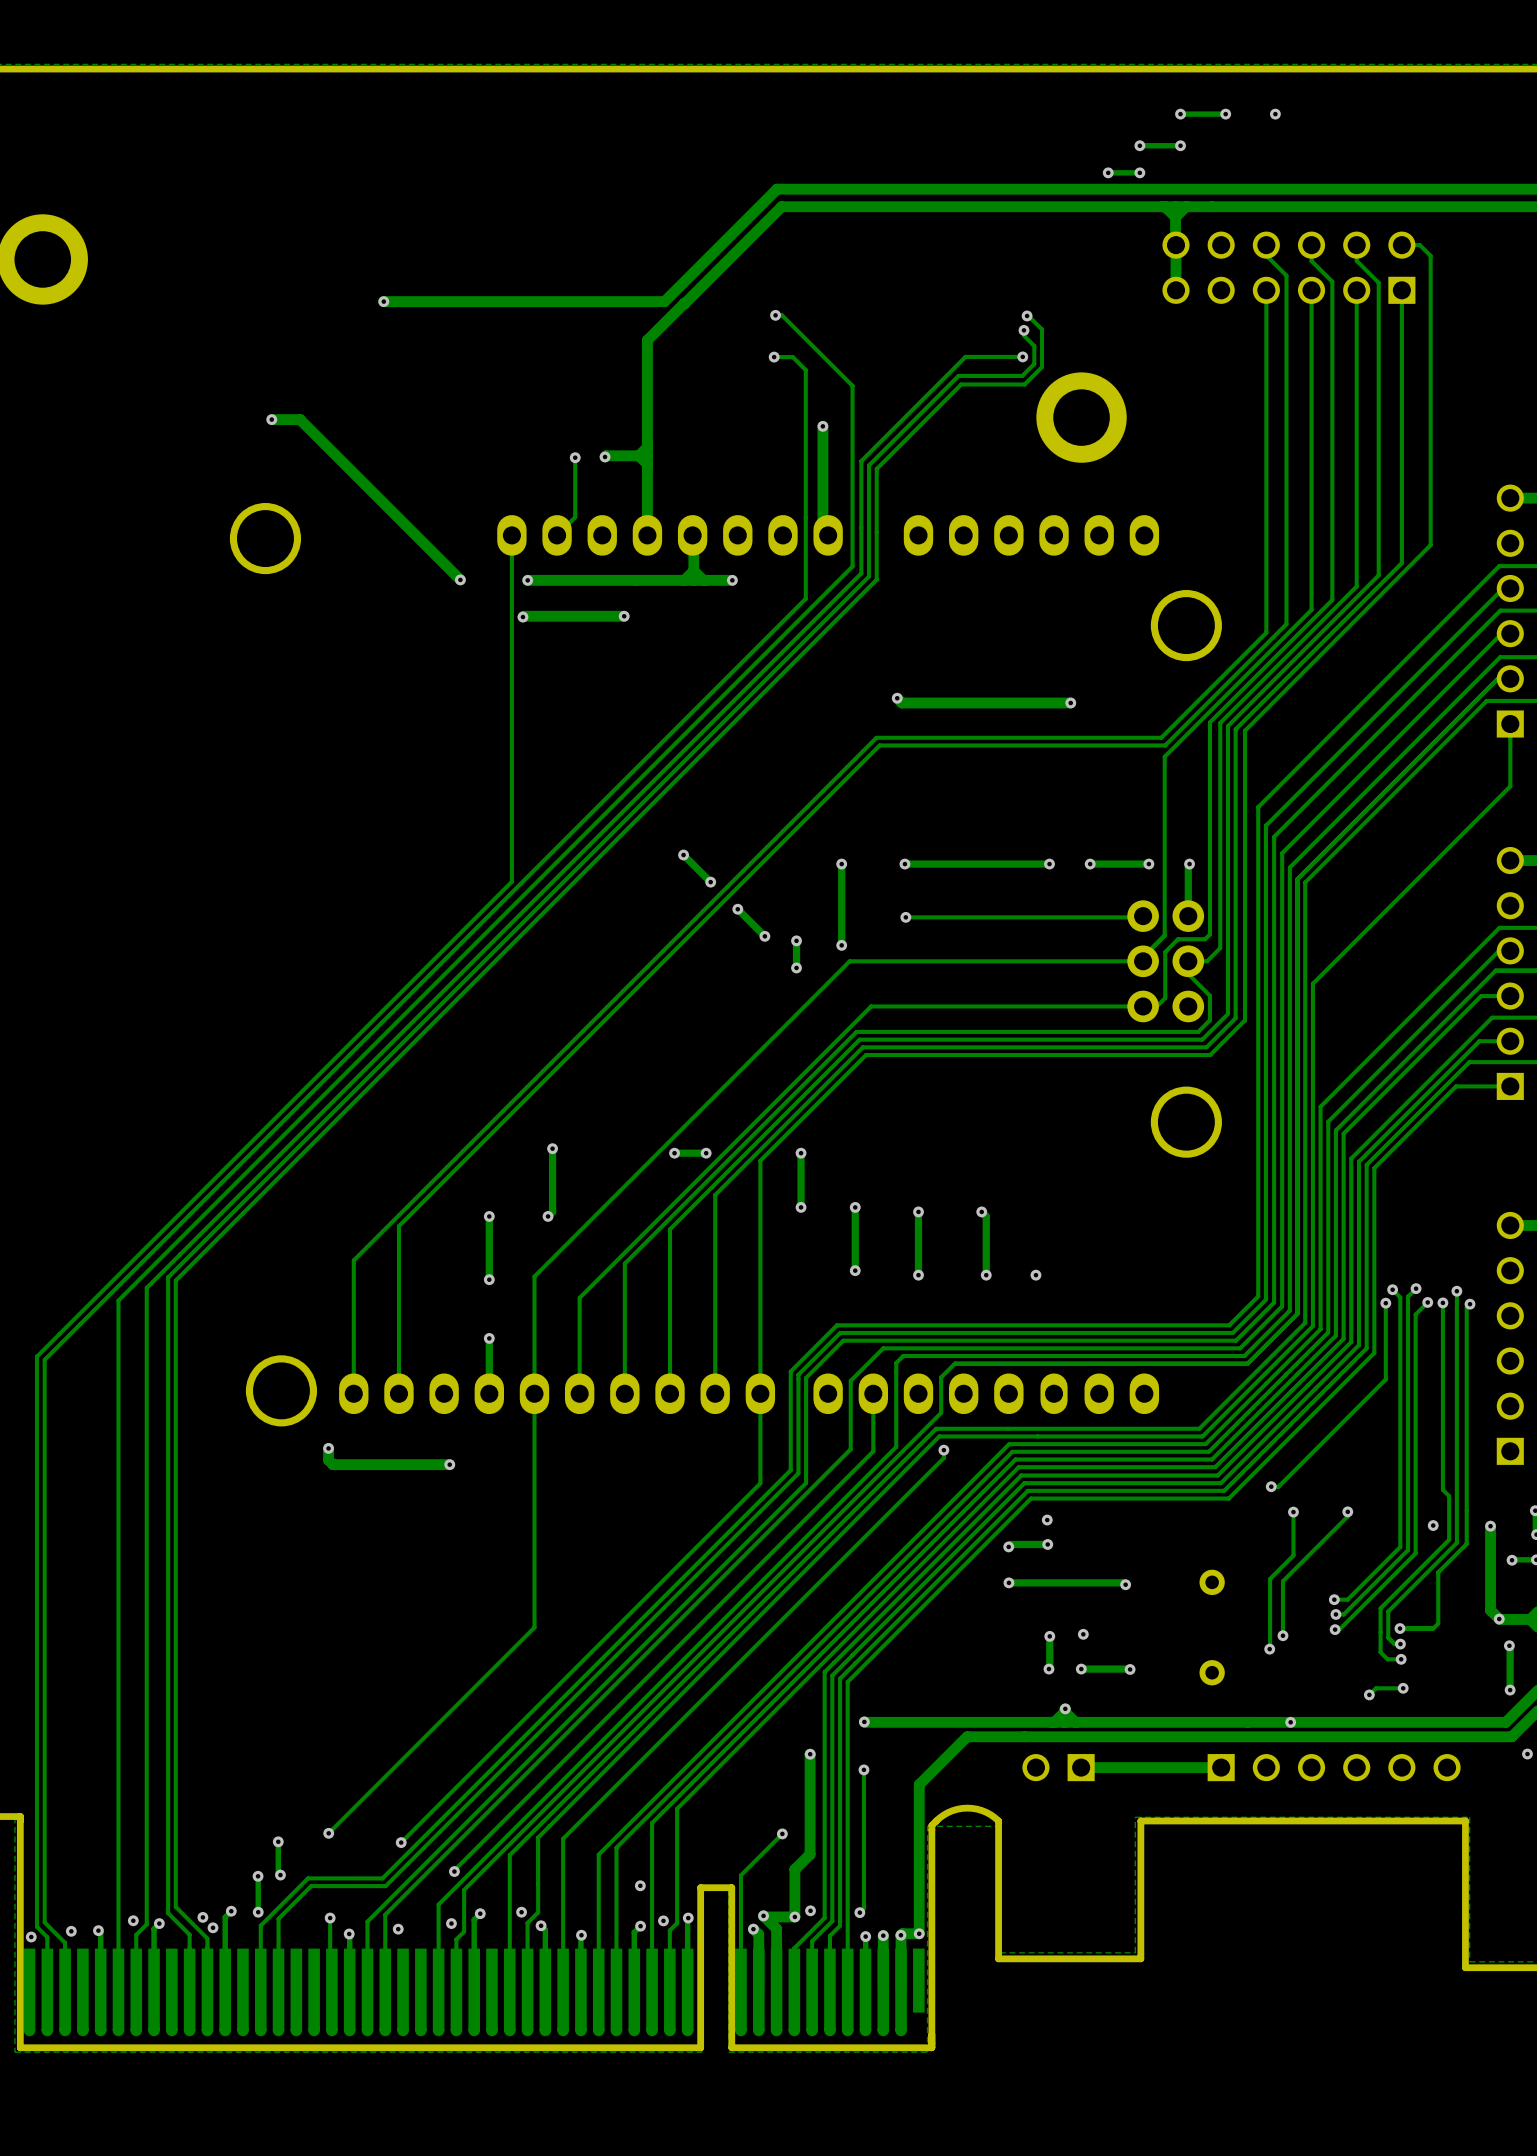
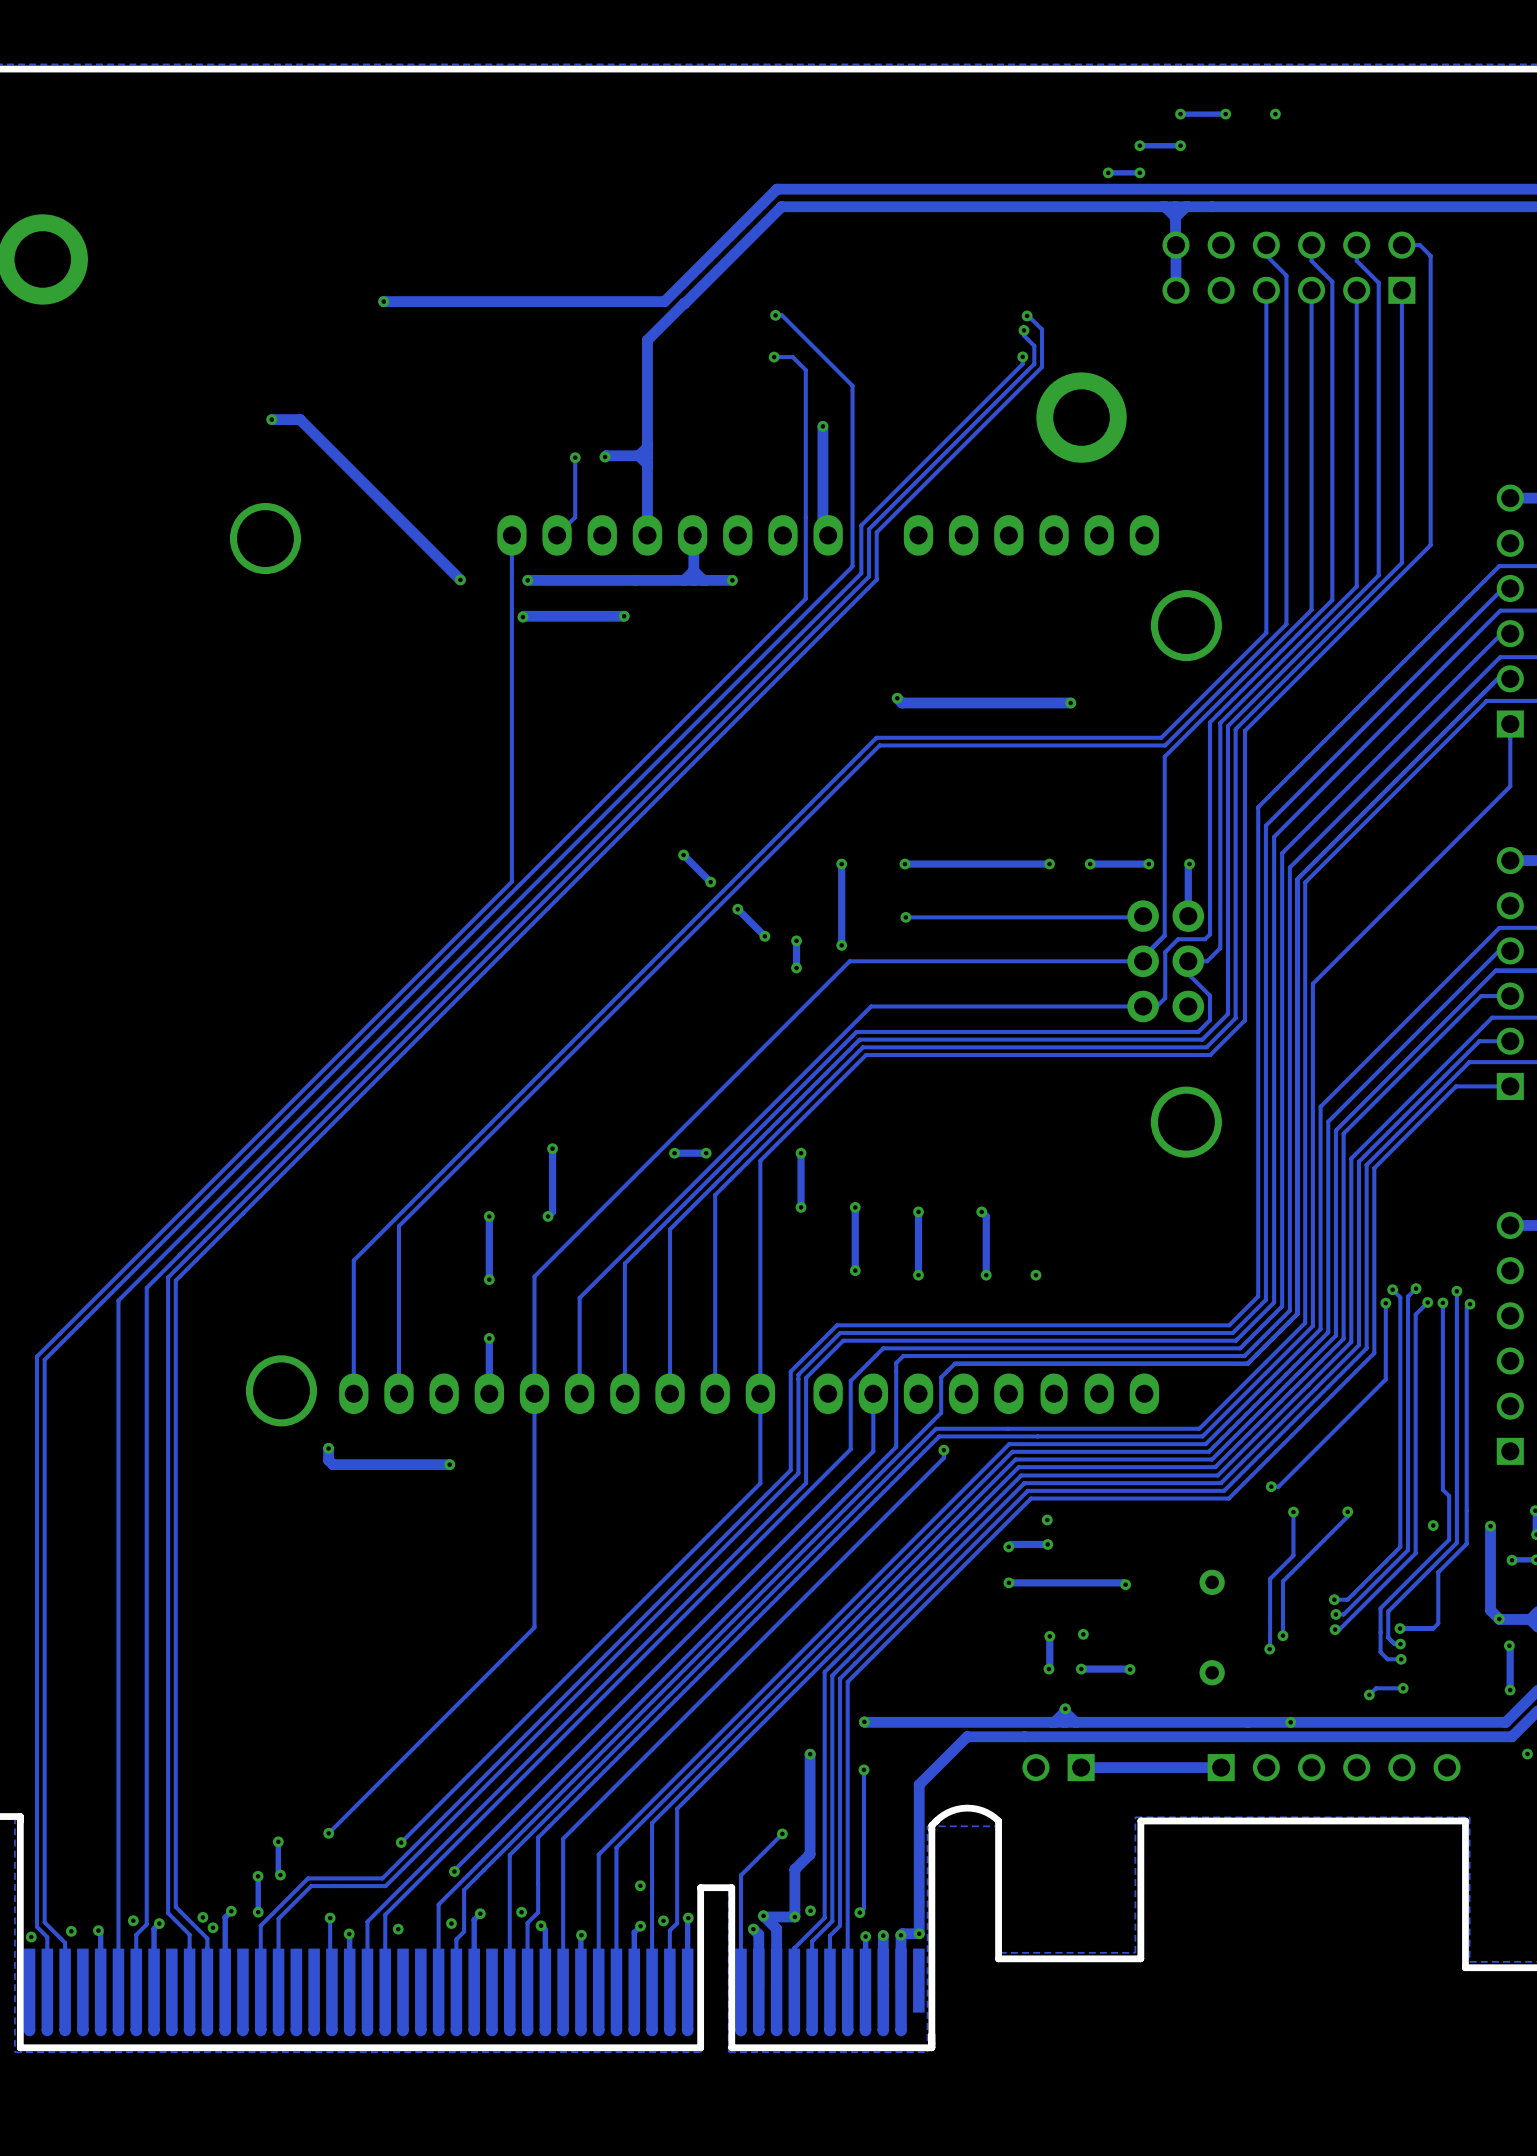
track: (1022, 356) (965, 356) (861, 461) (861, 525) -> (1022, 356) (1022, 364) (861, 525)
track: (1022, 375) (958, 375) (869, 465) (869, 529) -> (1022, 375) (869, 529)
track: (1024, 384) (961, 384) (876, 468) (876, 532) -> (1024, 384) (876, 532)

